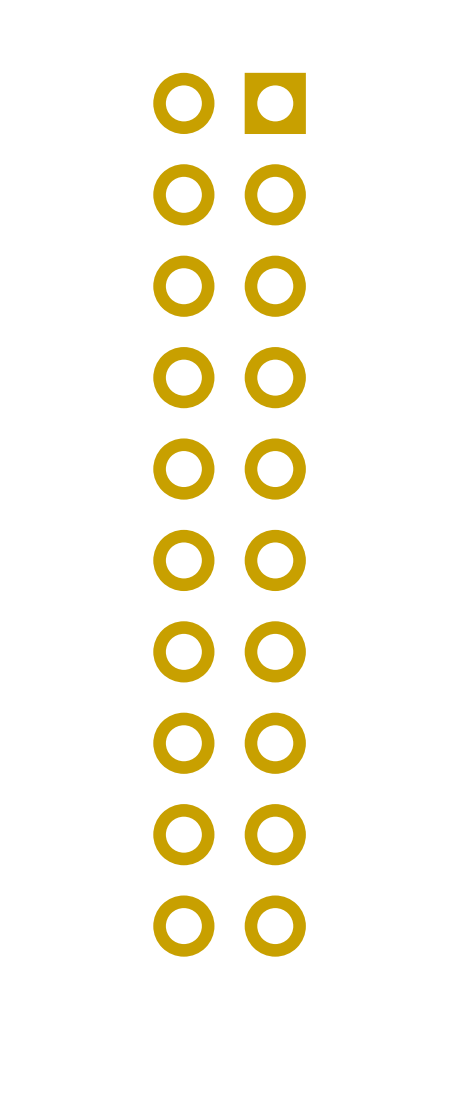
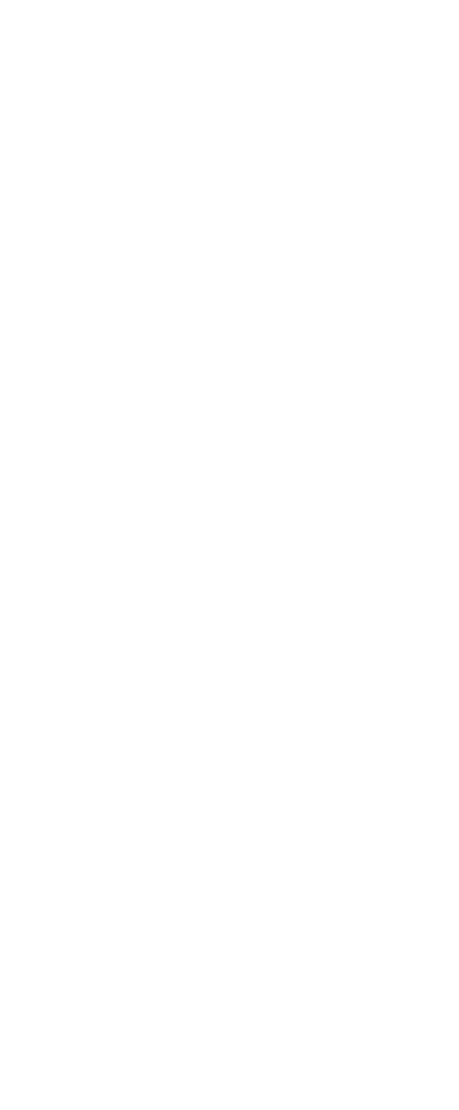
part: (229, 514) -> none

